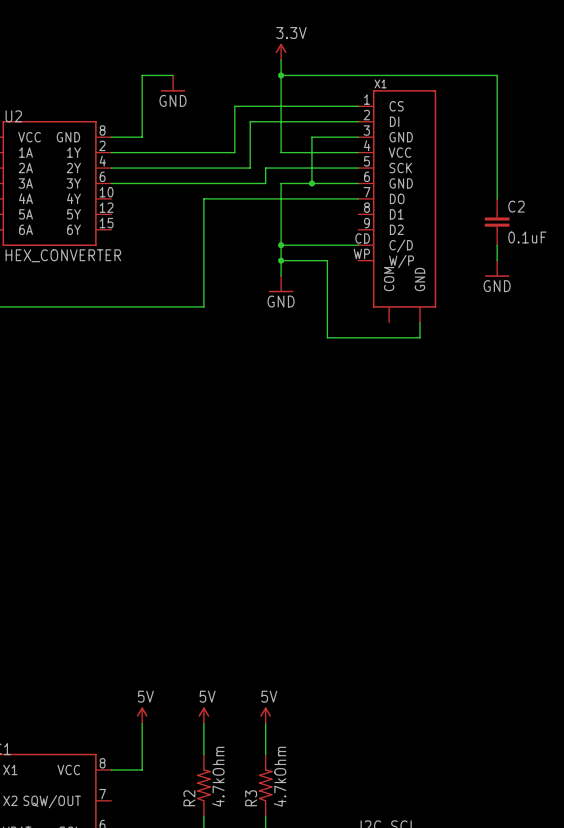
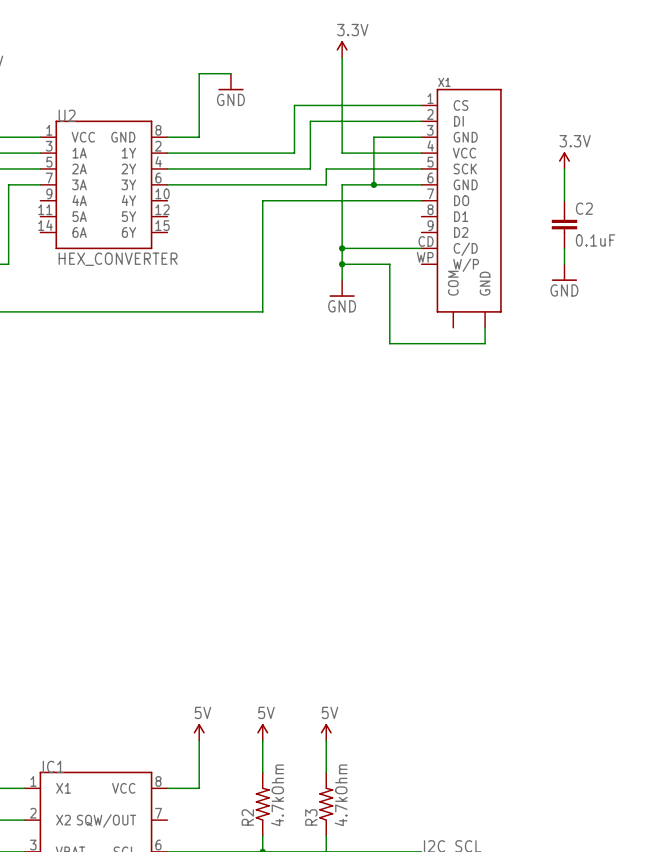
wire: (281, 75) (497, 75) (497, 168) -> none
junction: (281, 75) -> none
power symbol: none -> 3.3V (564, 160)

